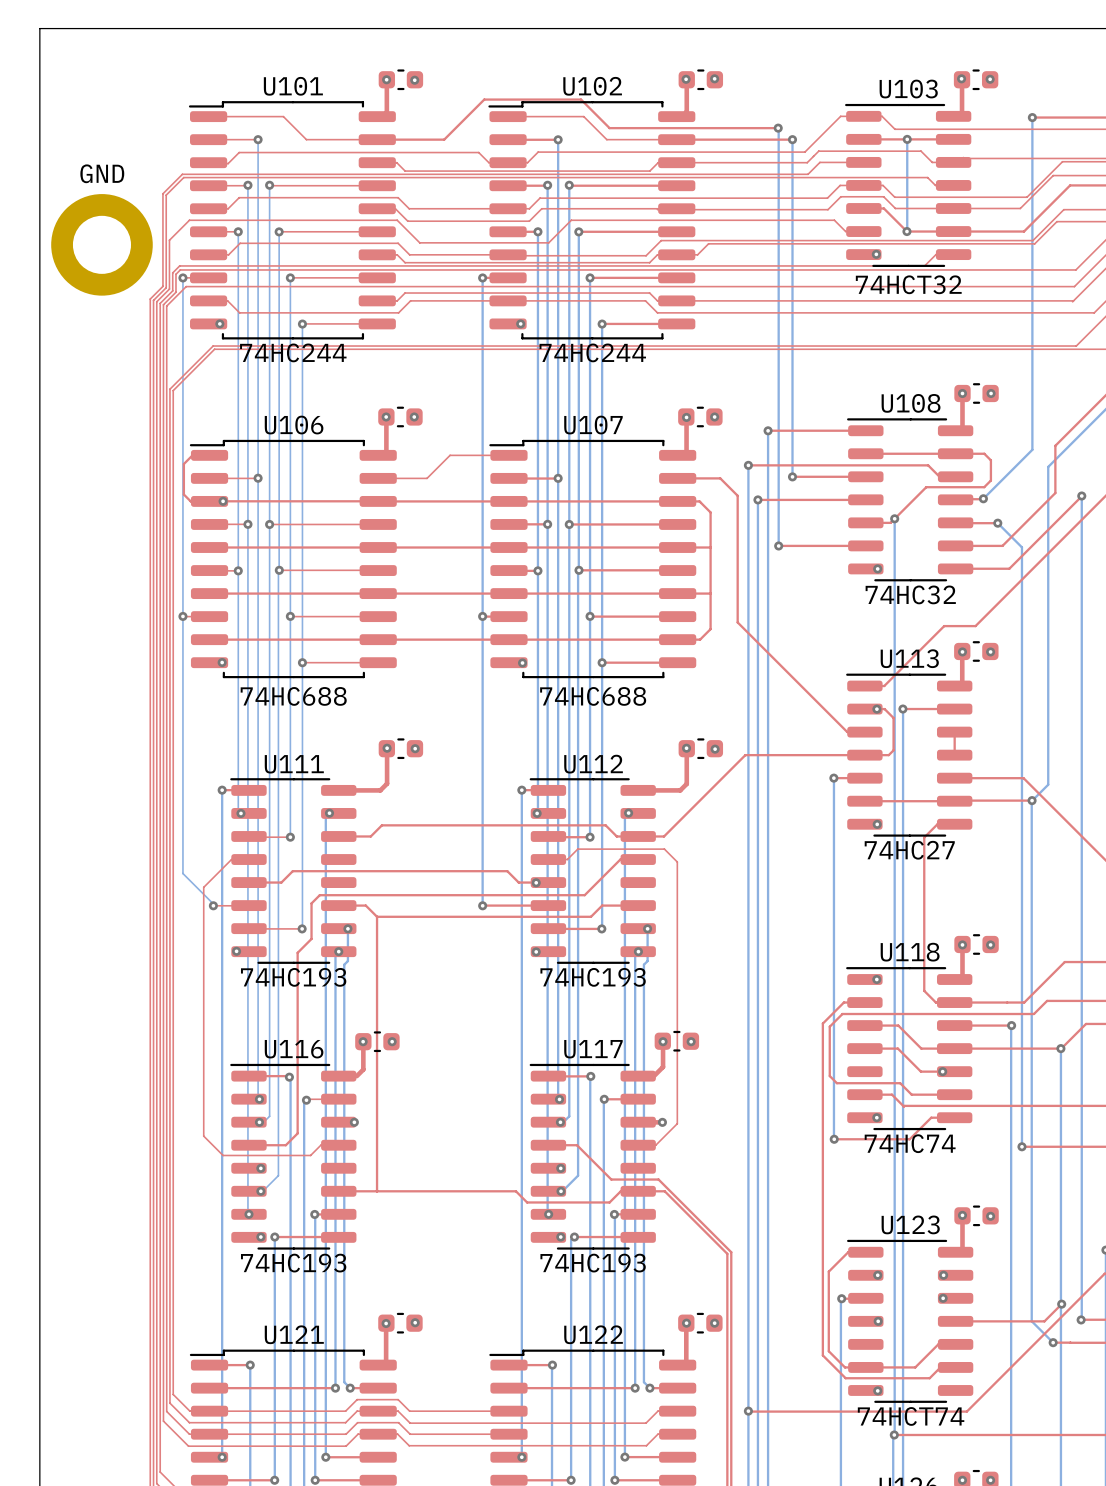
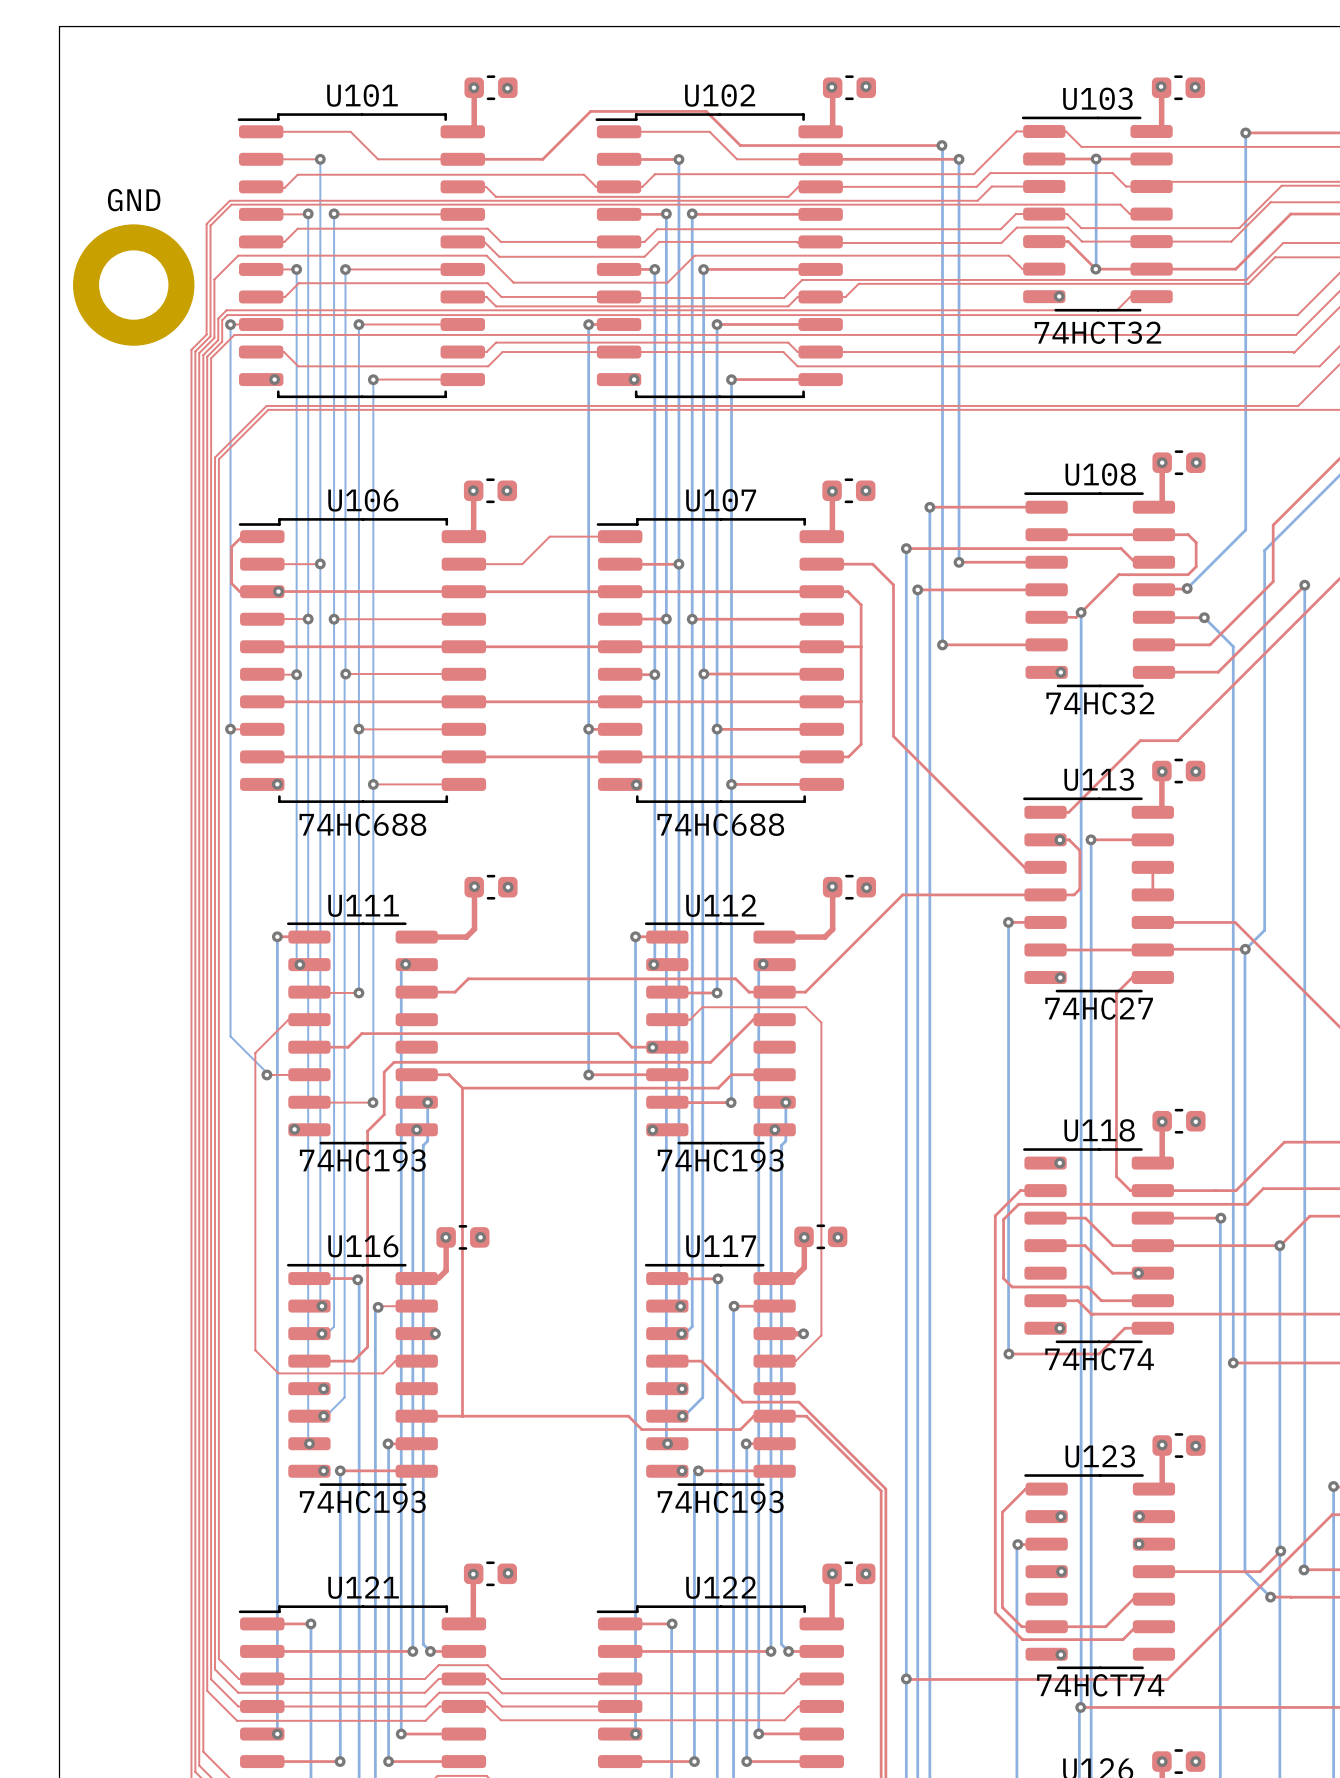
U101 value: 74HC244 (293, 352) -> none
U102 value: 74HC244 (592, 352) -> none

